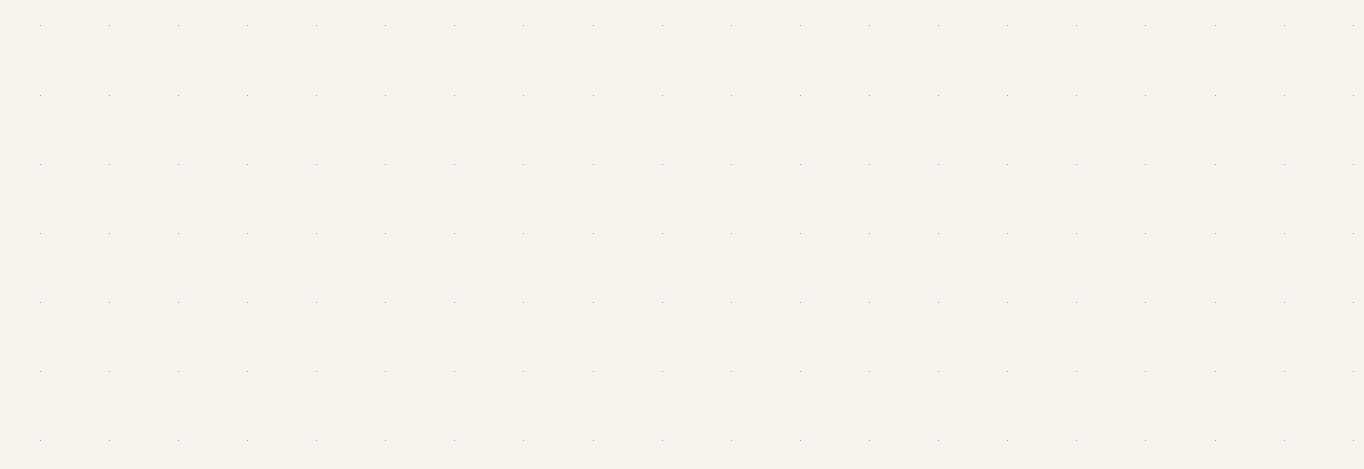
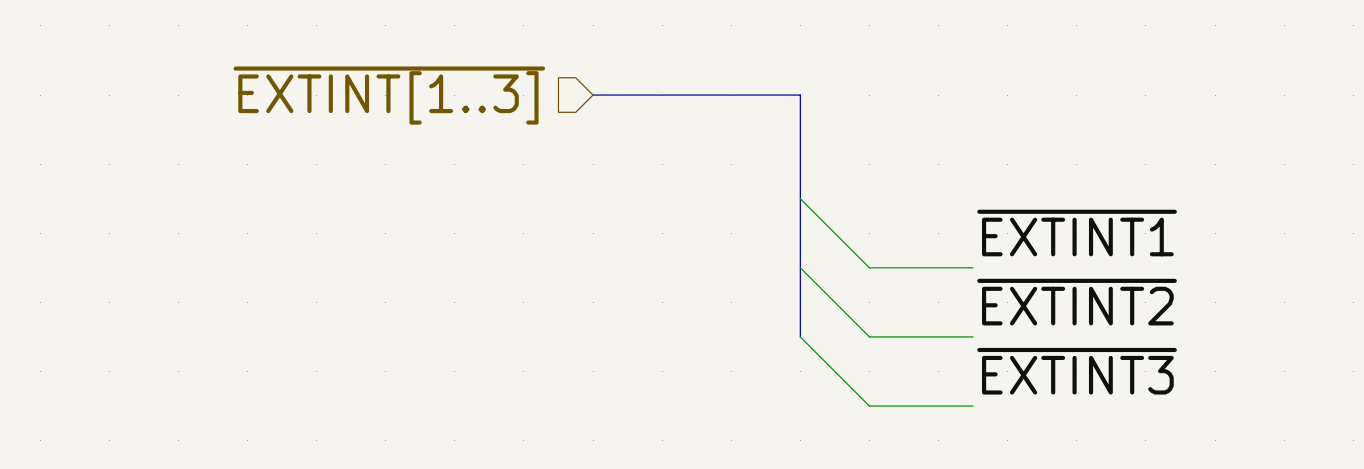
hierarchical label: none -> ~{EXTINT[1..3]} (389, 95)
bus: none -> (593, 95) (800, 95) (800, 336)
wire: none -> (800, 198) (869, 267) (973, 267)
label: none -> ~{EXTINT1} (1077, 233)
wire: none -> (800, 267) (869, 336) (973, 336)
label: none -> ~{EXTINT2} (1077, 302)
wire: none -> (800, 336) (869, 406) (973, 406)
label: none -> ~{EXTINT3} (1077, 371)

